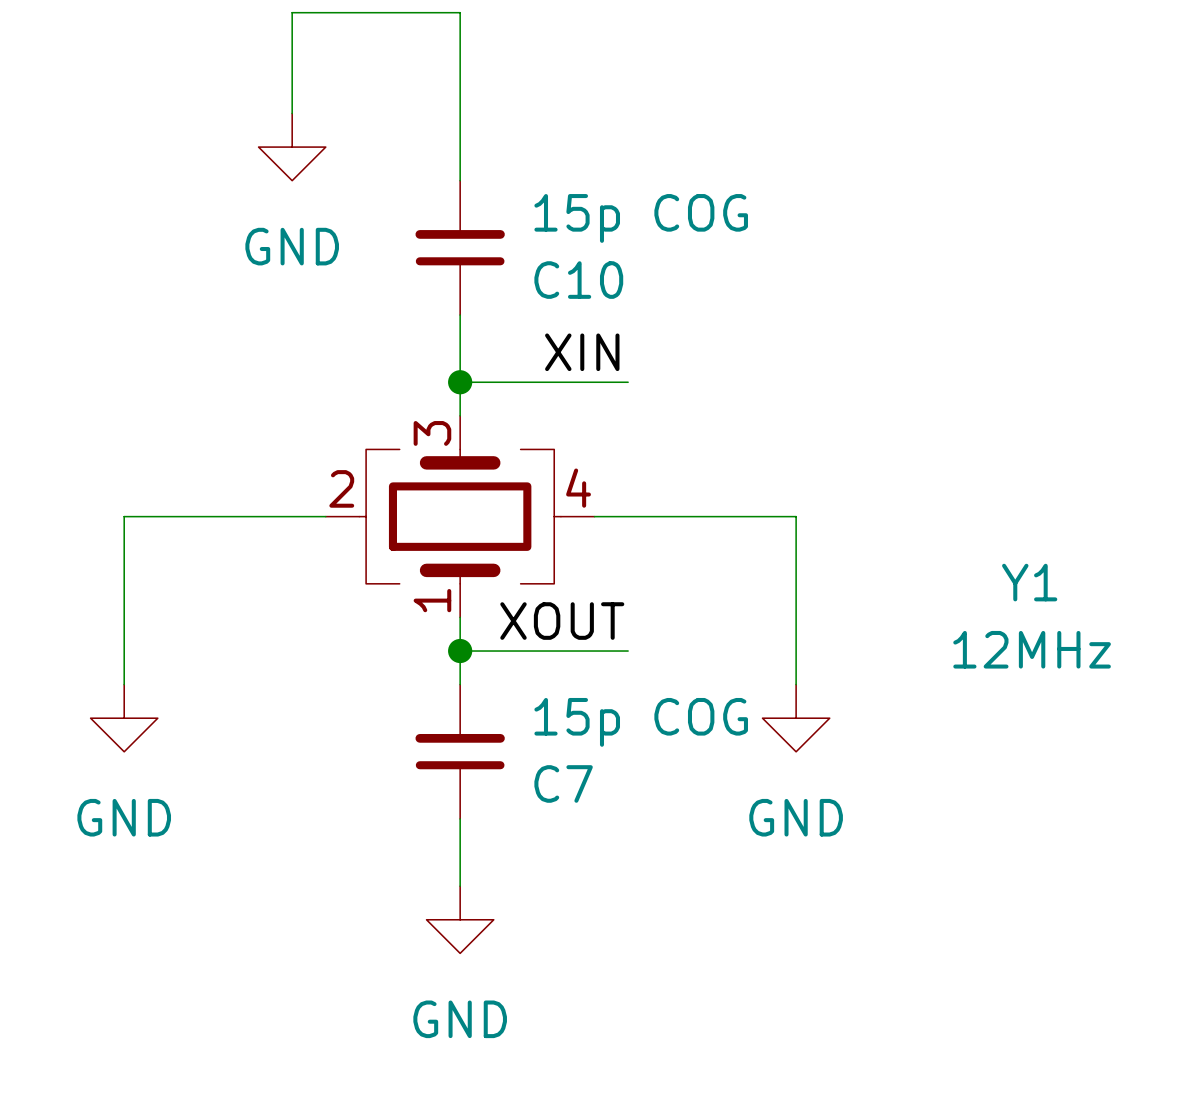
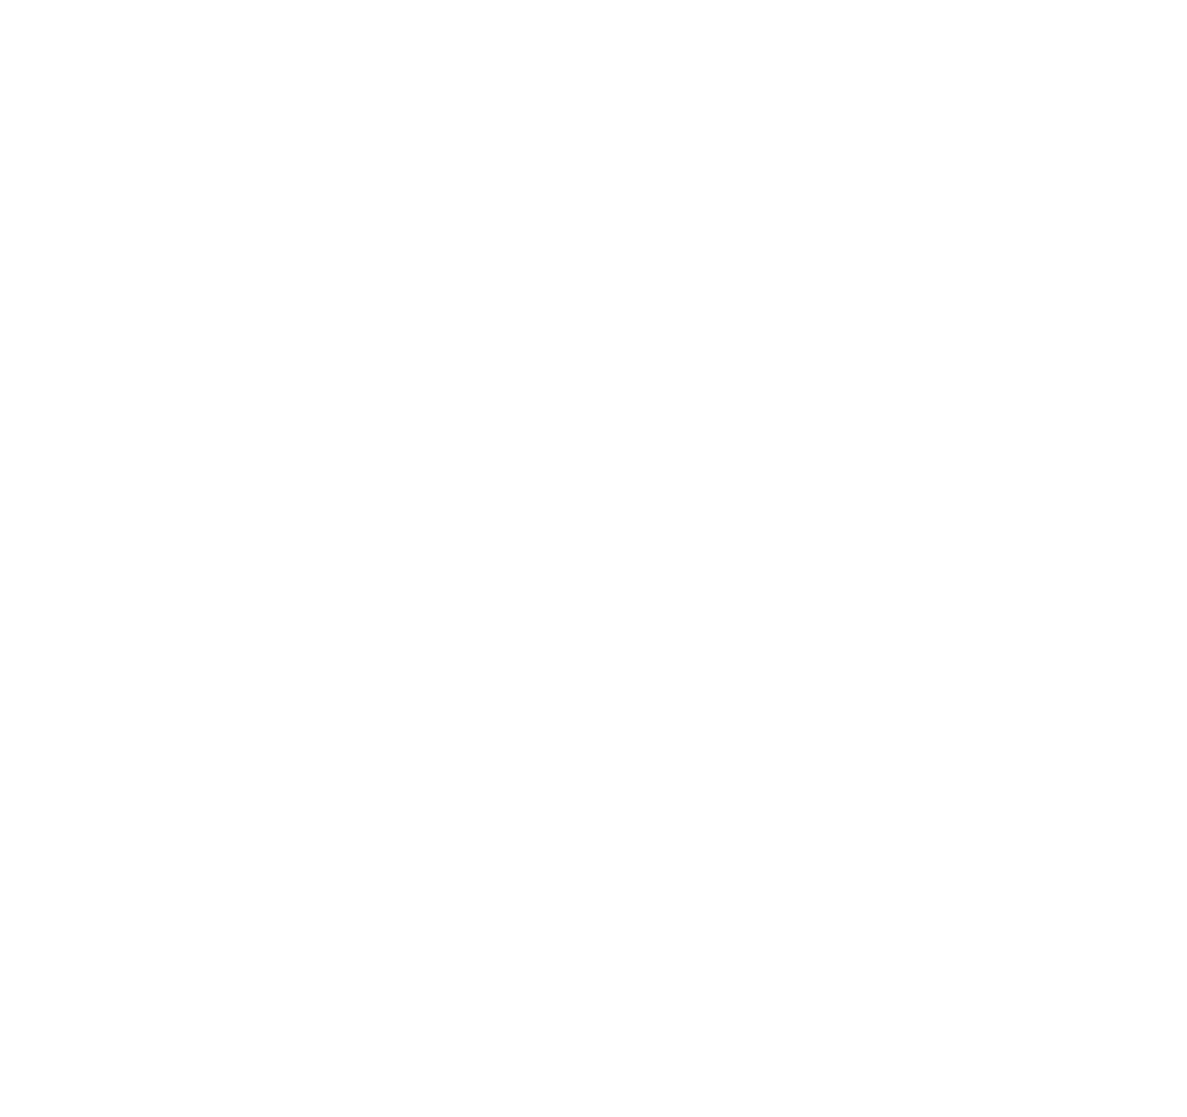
wire: (292, 113) (292, 12) (460, 12) (460, 180) -> none
power symbol: GND (292, 147) -> none
C10: 15p COG (460, 247) -> none
wire: (460, 315) (460, 415) -> none
label: XIN (582, 352) -> none
wire: (460, 382) (628, 382) -> none
junction: (460, 382) -> none
wire: (325, 516) (124, 516) (124, 684) -> none
Y1: 12MHz (460, 516) -> none
wire: (594, 516) (796, 516) (796, 684) -> none
wire: (460, 617) (460, 684) -> none
label: XOUT (562, 621) -> none
wire: (460, 651) (628, 651) -> none
junction: (460, 651) -> none
power symbol: GND (124, 718) -> none
power symbol: GND (796, 718) -> none
C7: 15p COG (460, 751) -> none
wire: (460, 818) (460, 886) -> none
power symbol: GND (460, 919) -> none

